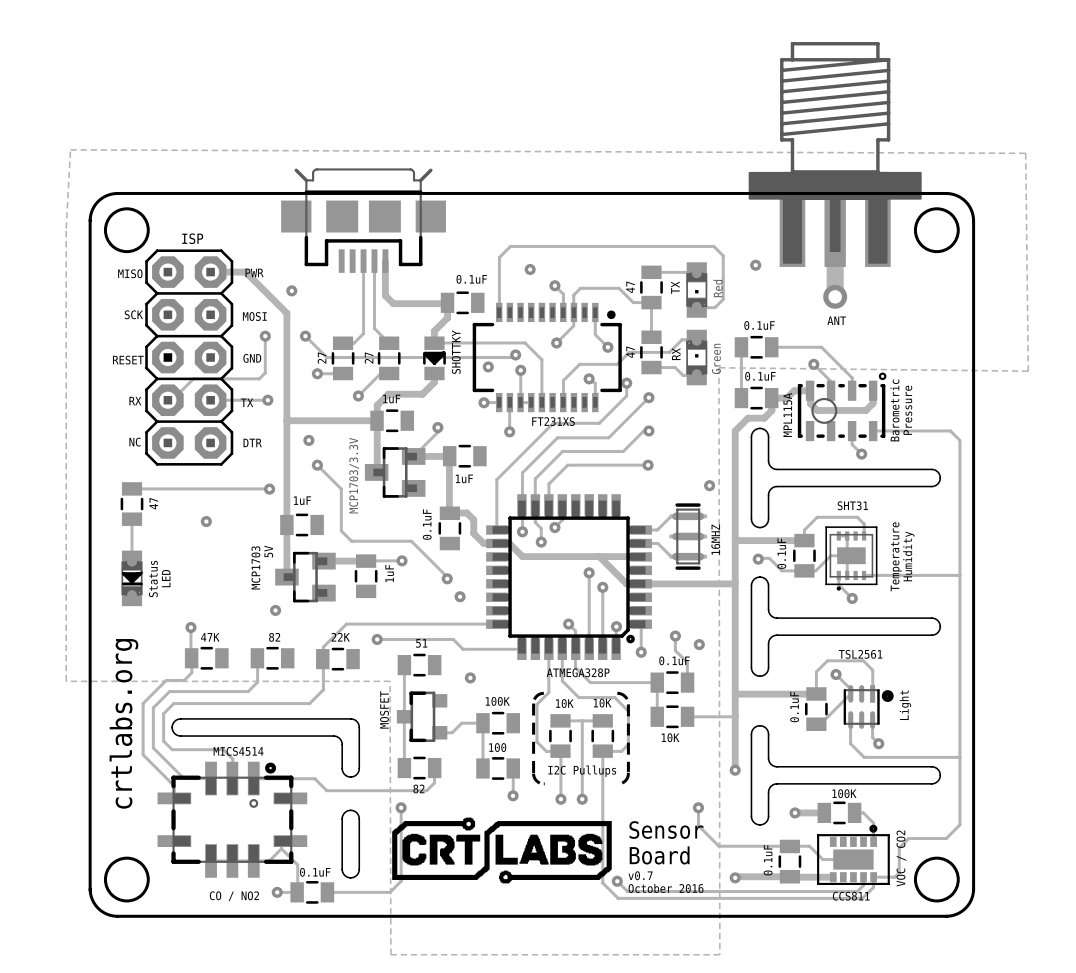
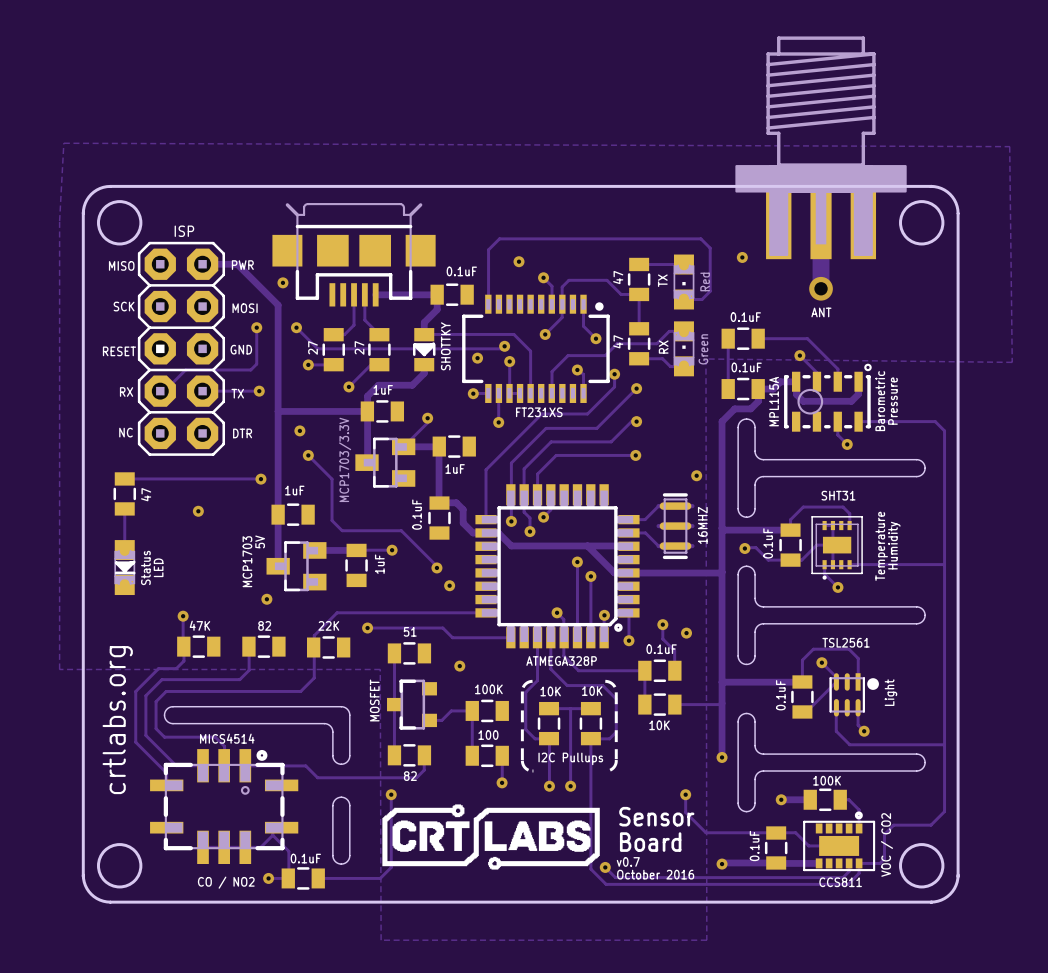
part position: (363, 220) -> (354, 254)
track: (363, 261) (363, 302) -> none
track: (374, 261) (374, 302) -> none
track: (385, 261) (385, 295) (393, 303) (447, 302) -> (375, 294) (437, 294)

